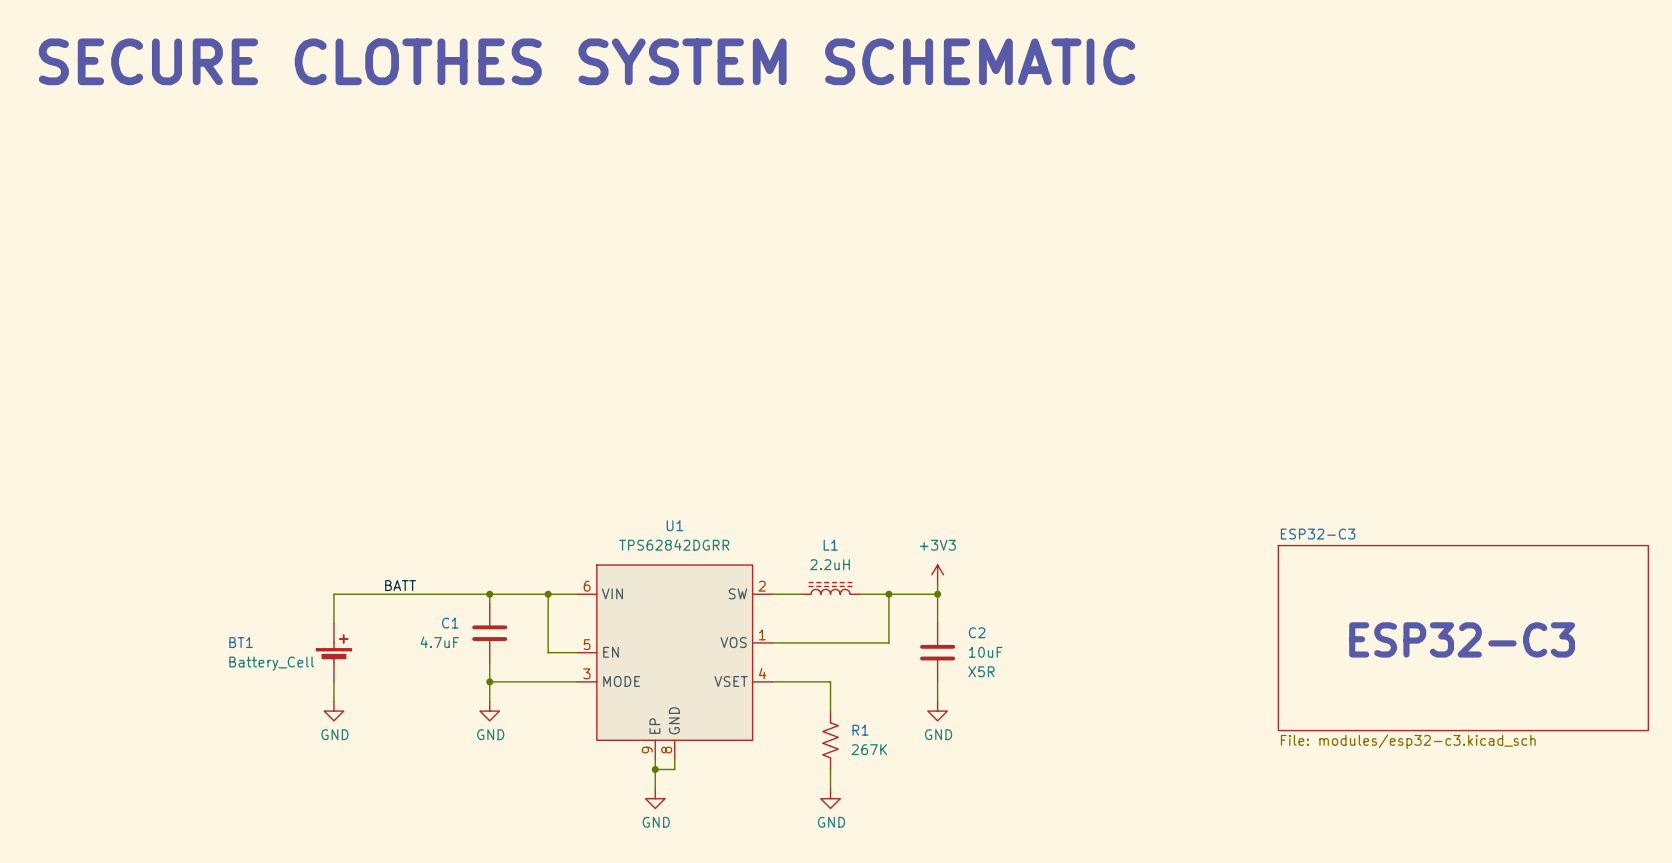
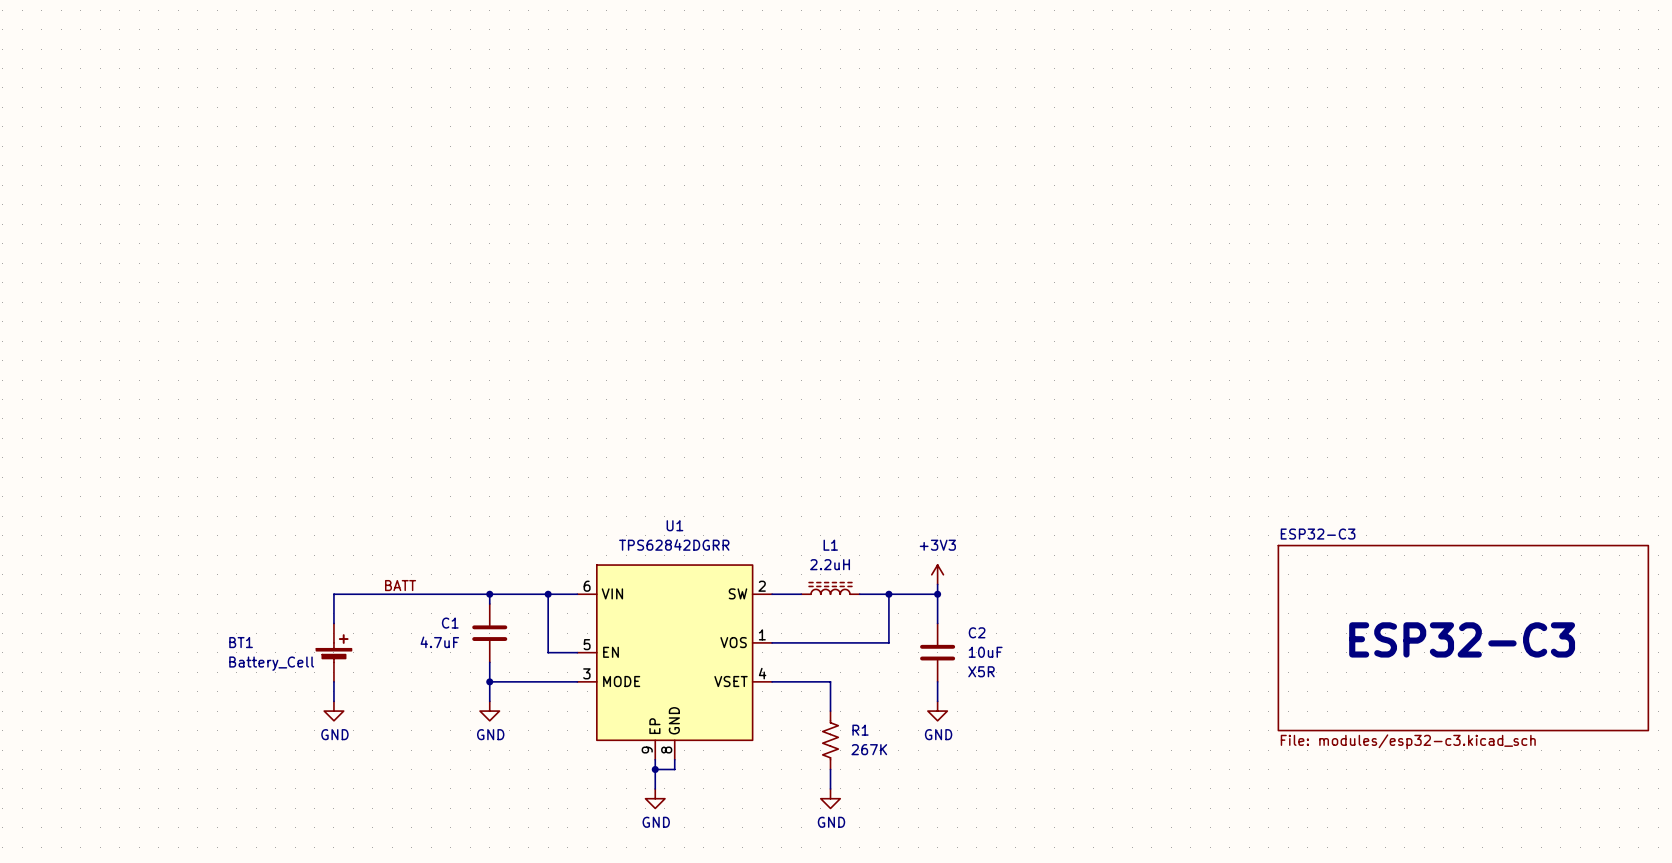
text: SECURE CLOTHES SYSTEM SCHEMATIC (587, 61) -> none

